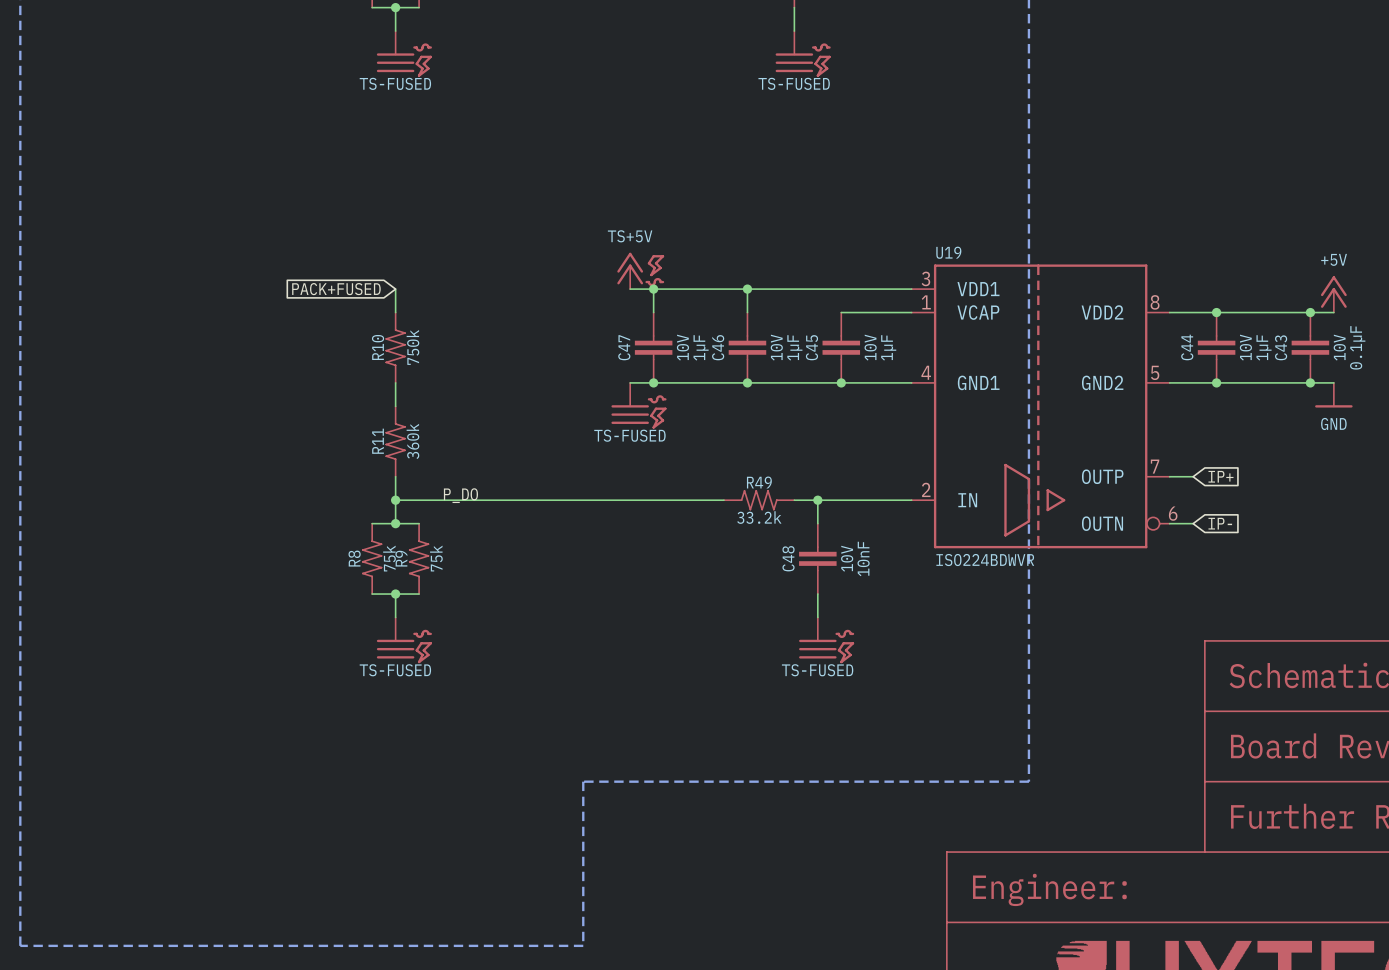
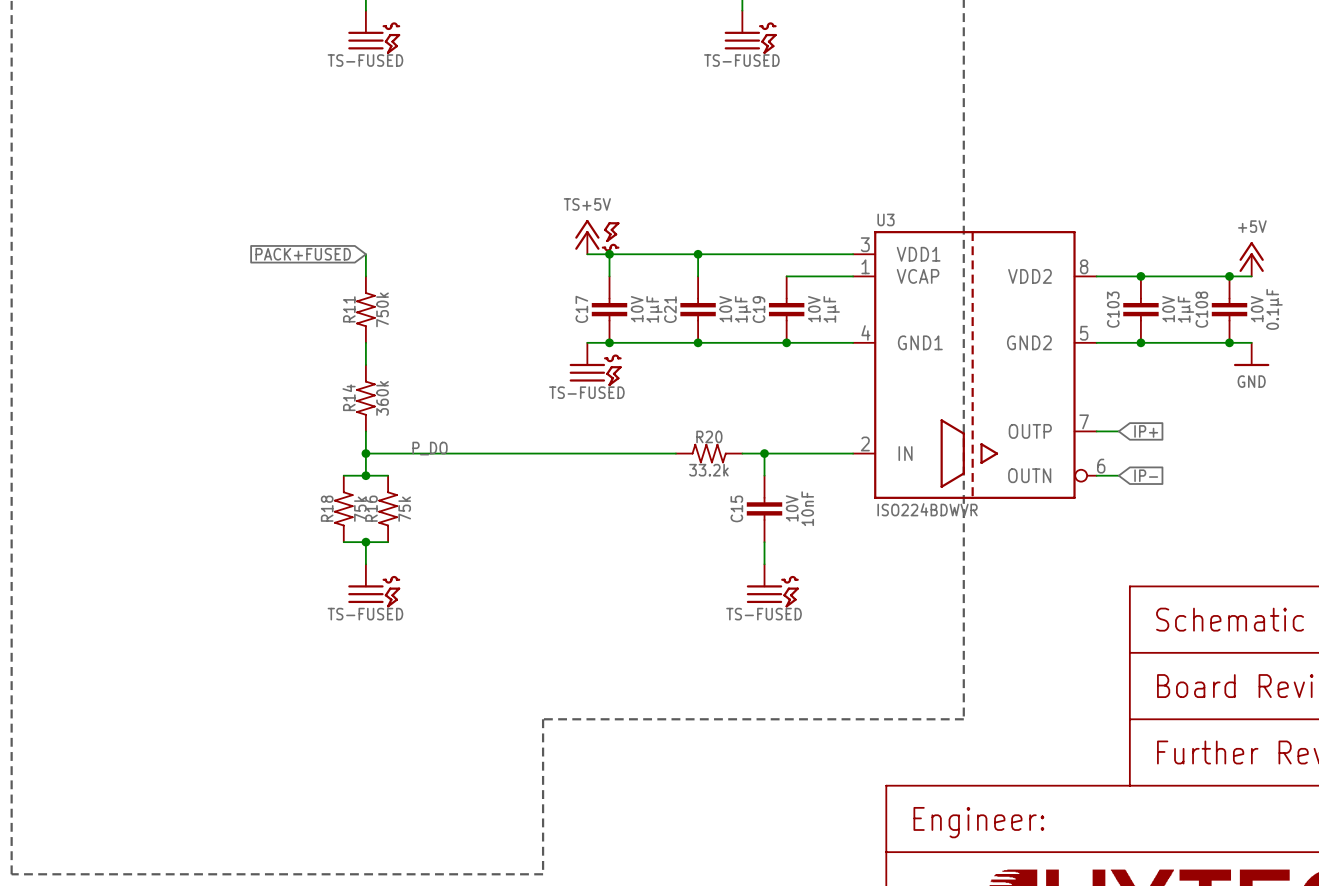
U19 name: U19 (948, 252) -> U3 (886, 219)
R10 name: R10 (378, 347) -> R11 (349, 309)
C47 name: C47 (624, 347) -> C17 (581, 309)
C46 name: C46 (718, 347) -> C21 (670, 309)
C45 name: C45 (811, 347) -> C19 (758, 309)
C44 name: C44 (1187, 347) -> C103 (1113, 309)
C43 name: C43 (1281, 347) -> C108 (1201, 309)
R11 name: R11 (378, 441) -> R14 (349, 397)
R49 name: R49 (759, 482) -> R20 (709, 436)
R8 name: R8 (354, 558) -> R18 (327, 508)
R9 name: R9 (401, 558) -> R16 (371, 508)
C48 name: C48 (788, 558) -> C15 (736, 508)

